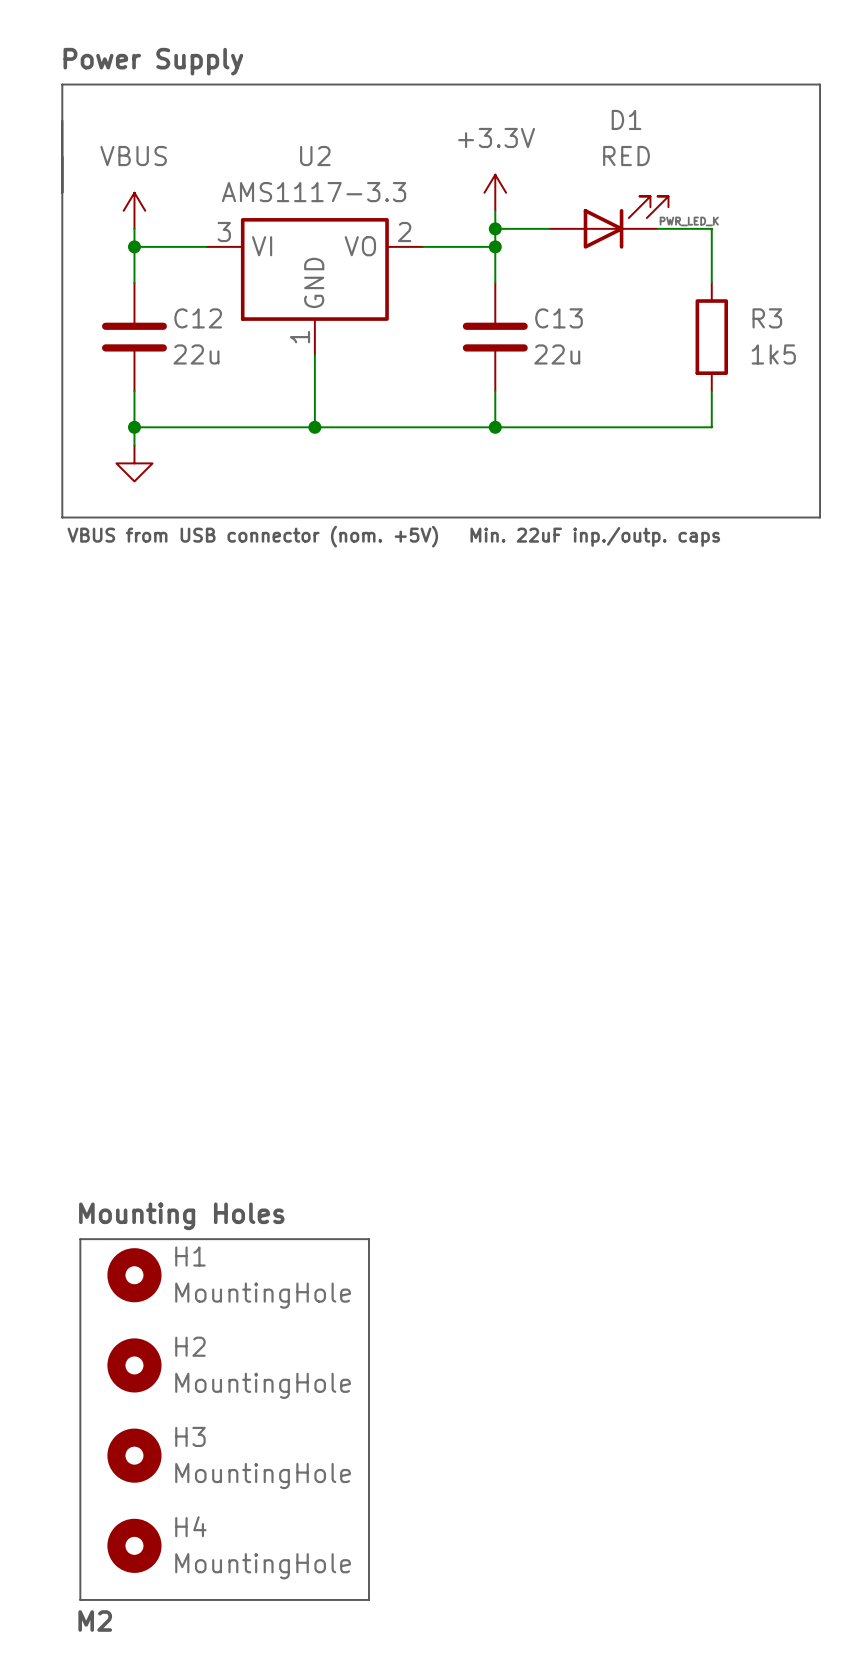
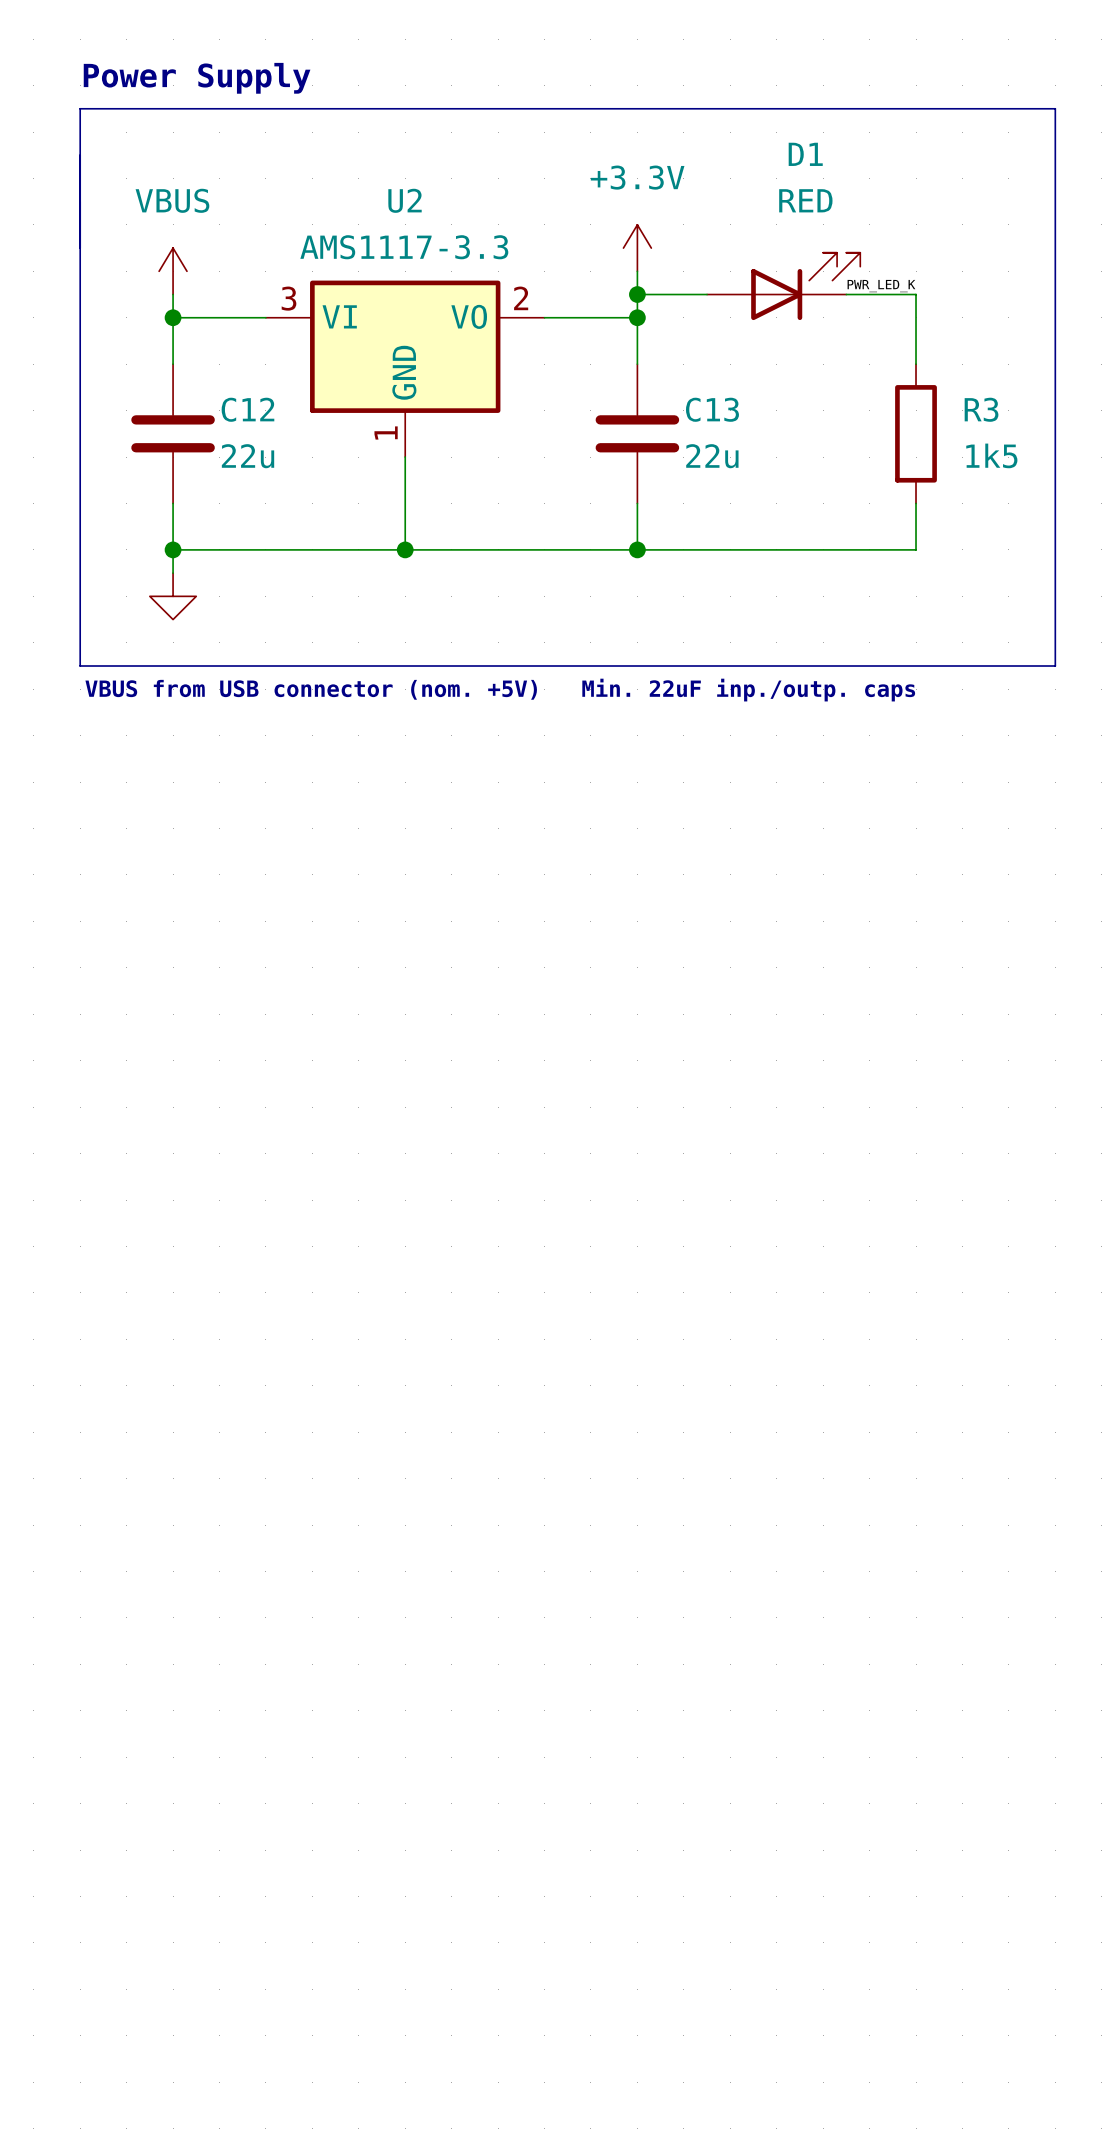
text: Mounting Holes (181, 1216) -> none
line: (80, 1239) (369, 1239) (369, 1599) (80, 1599) (80, 1239) -> none
H1: MountingHole (134, 1275) -> none
H2: MountingHole (134, 1365) -> none
H3: MountingHole (134, 1455) -> none
H4: MountingHole (134, 1545) -> none
text: M2 (95, 1621) -> none

